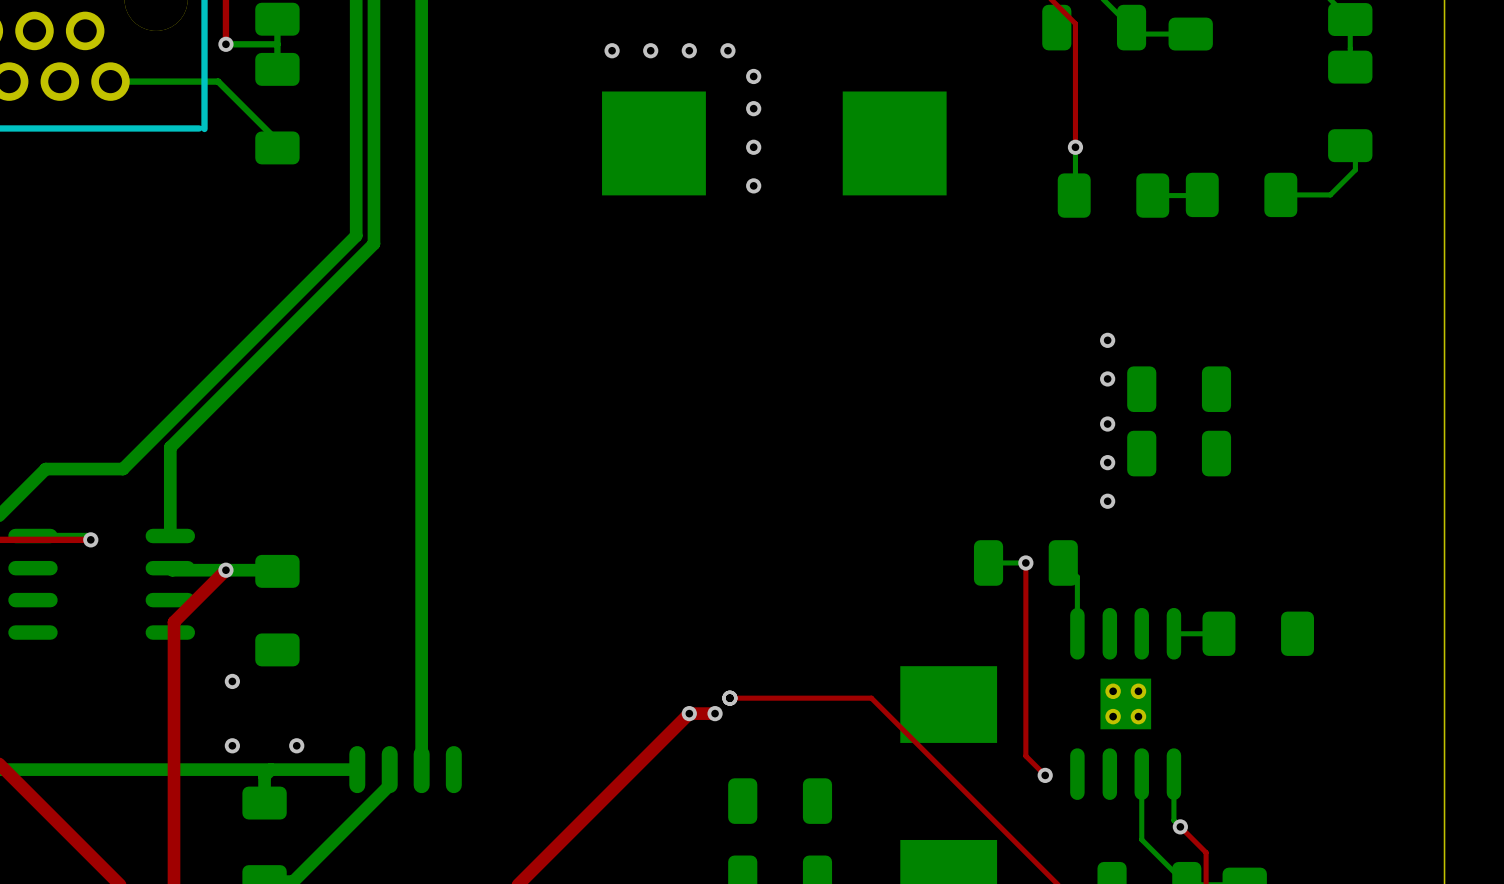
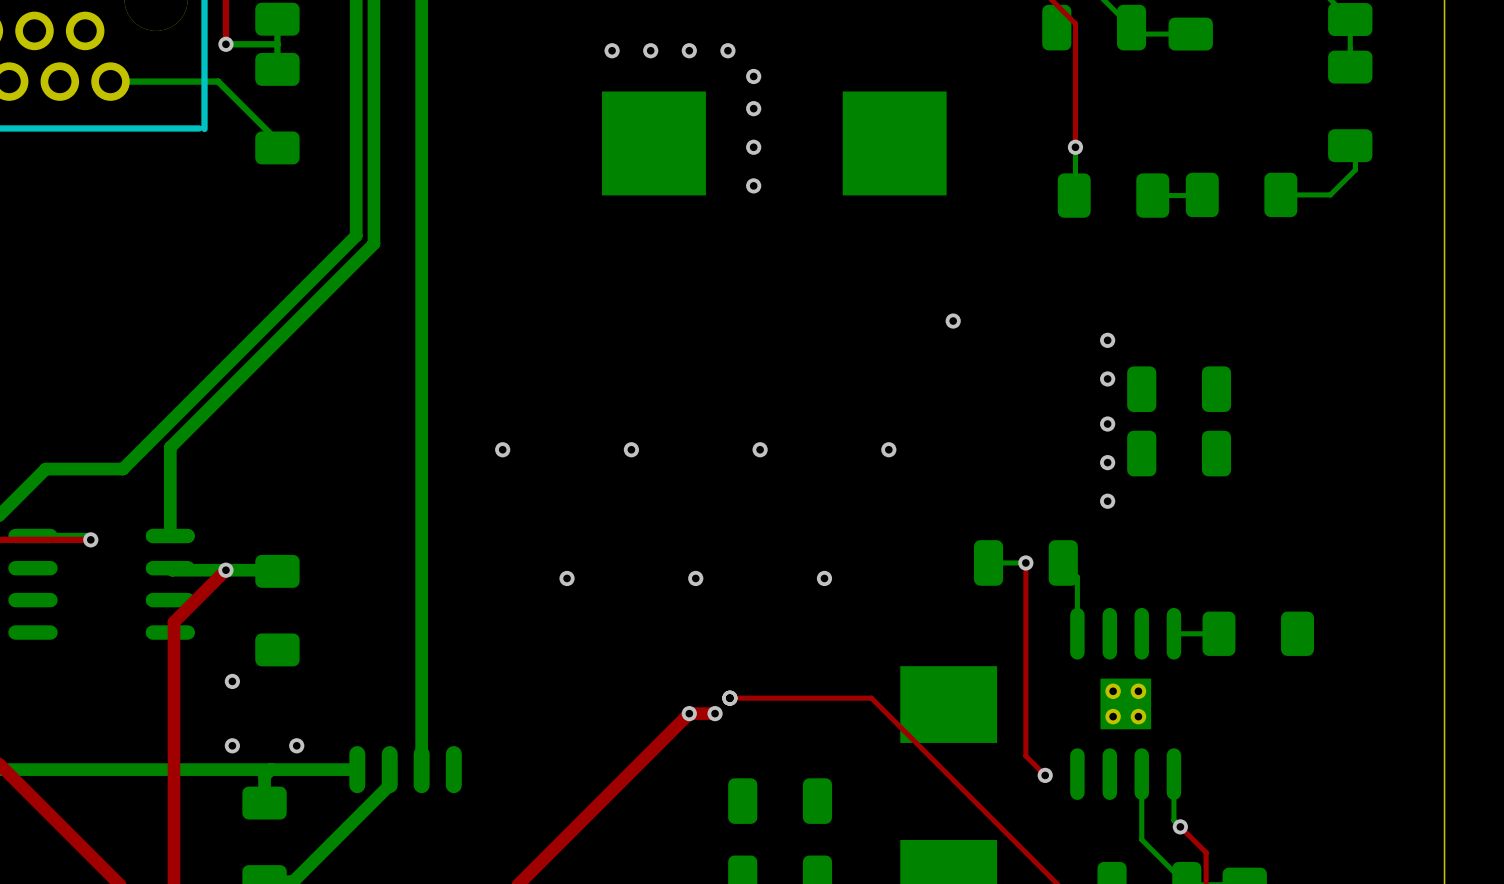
via: none -> (953, 321)
via: none -> (502, 449)
via: none -> (631, 449)
via: none -> (760, 449)
via: none -> (888, 449)
via: none -> (567, 578)
via: none -> (695, 578)
via: none -> (824, 578)

